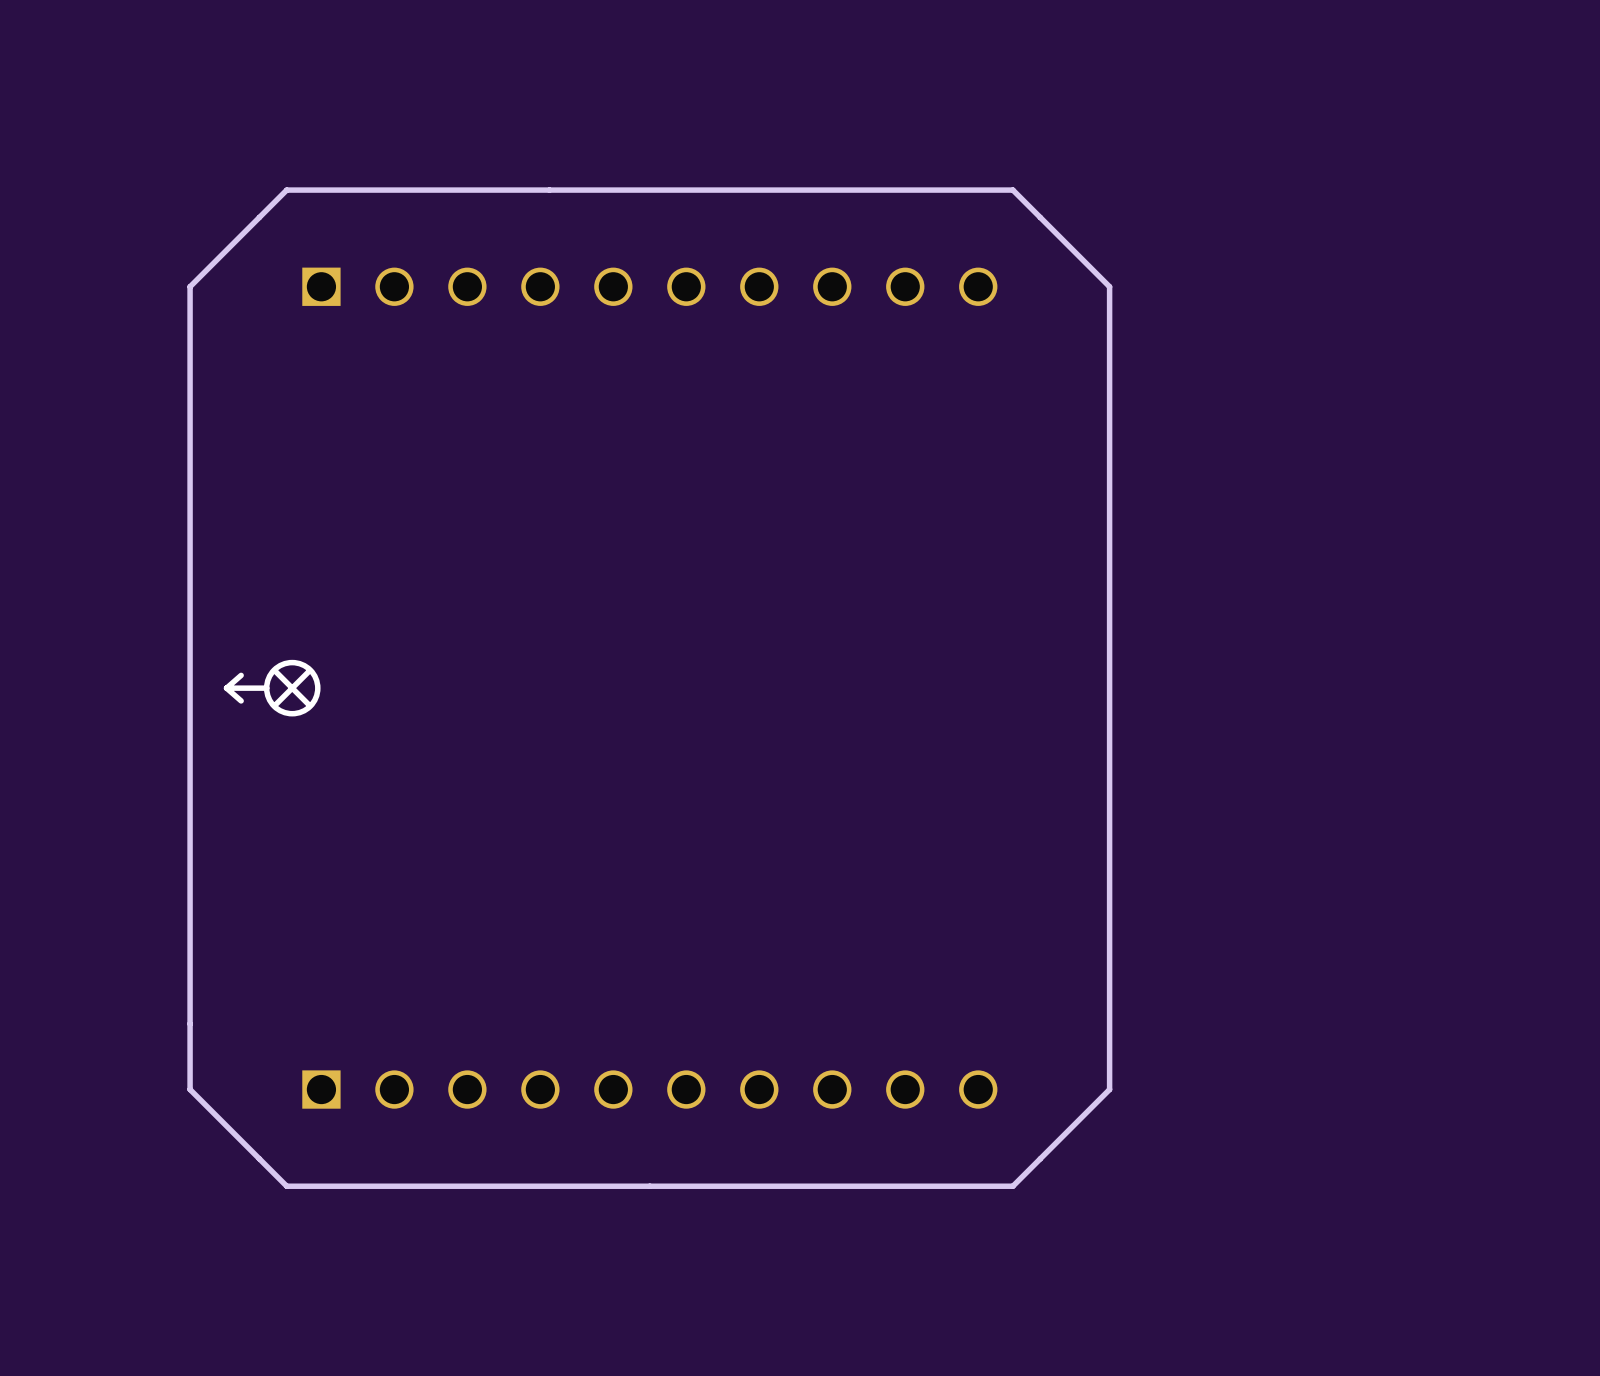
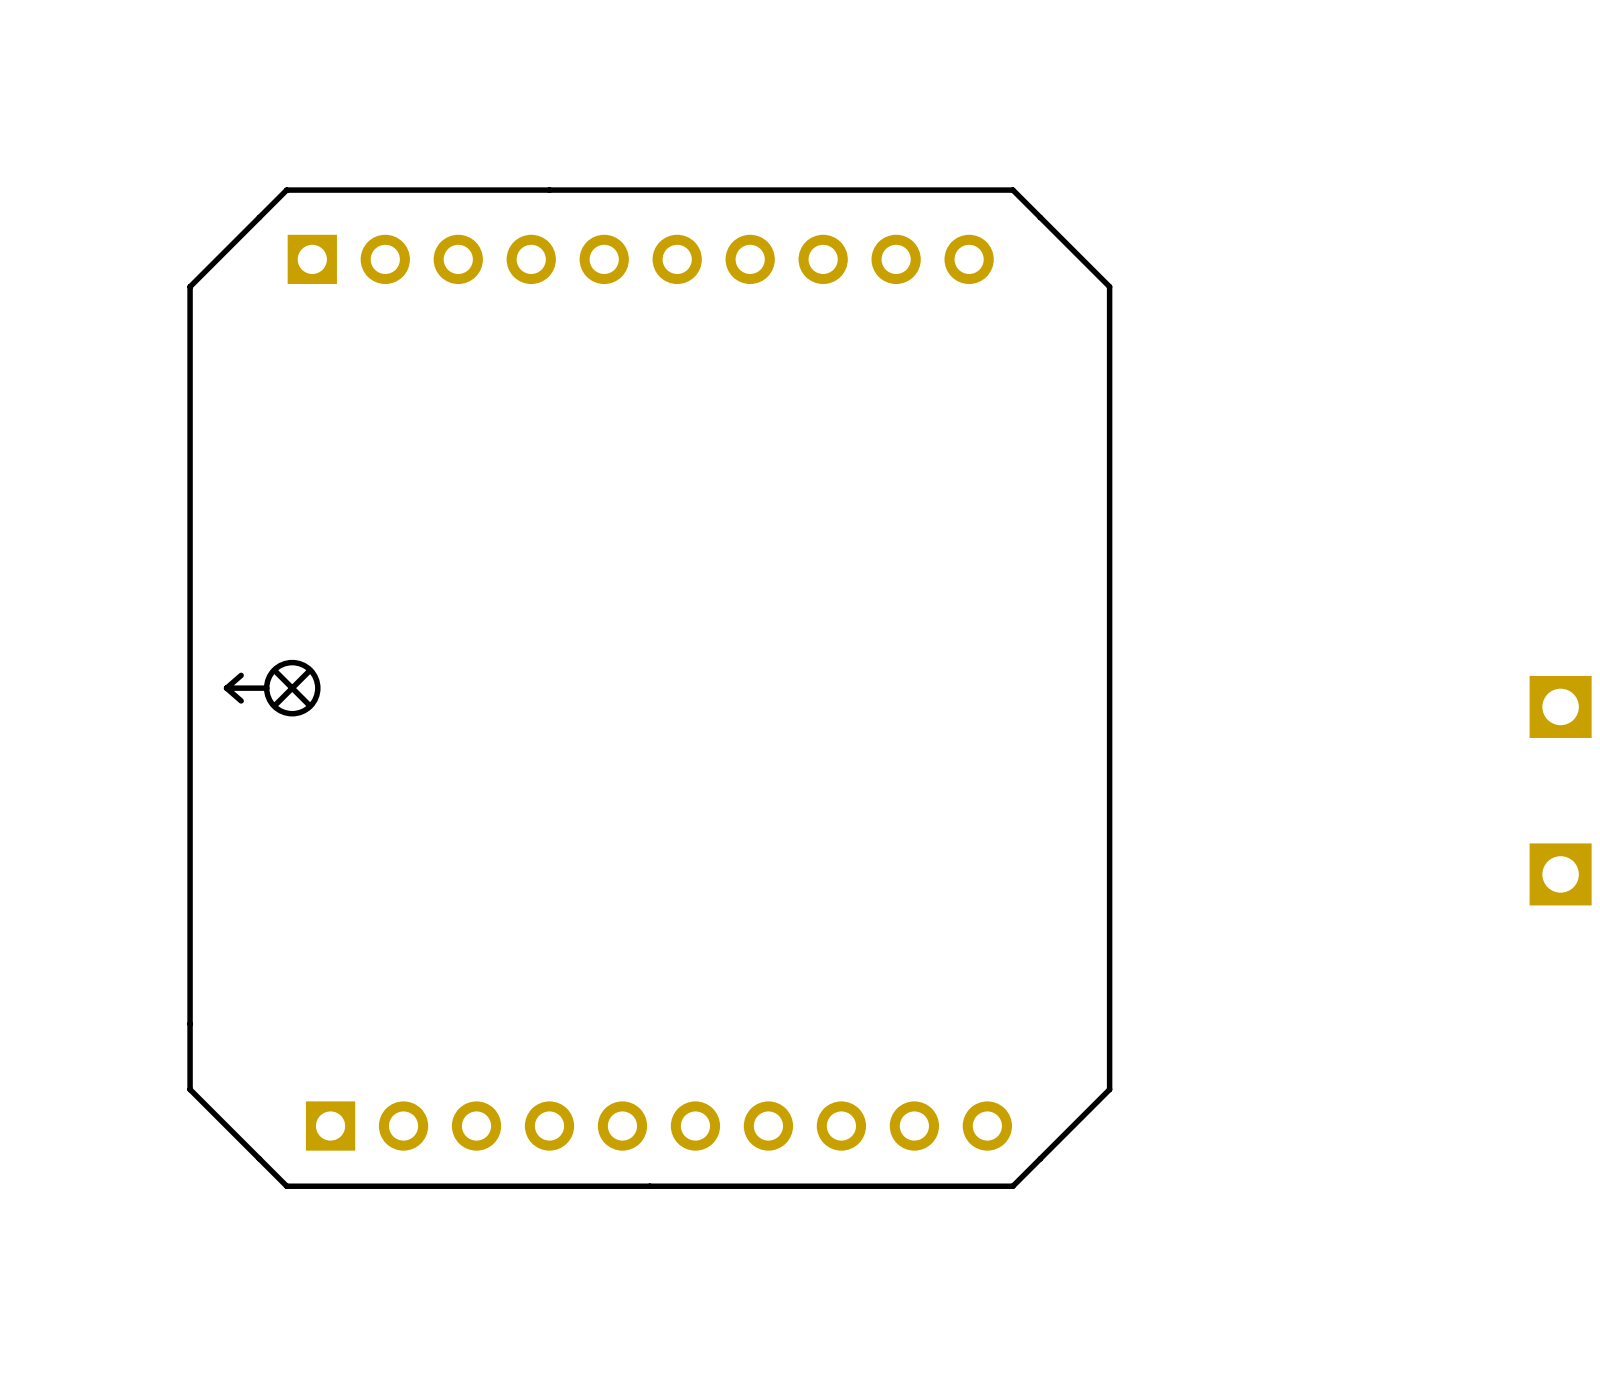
part footprint: [302, 267, 998, 306] -> [287, 234, 994, 285]
part: none -> (1560, 706)
part: none -> (1560, 874)
part: (649, 1089) -> none
part: none -> (658, 1126)

